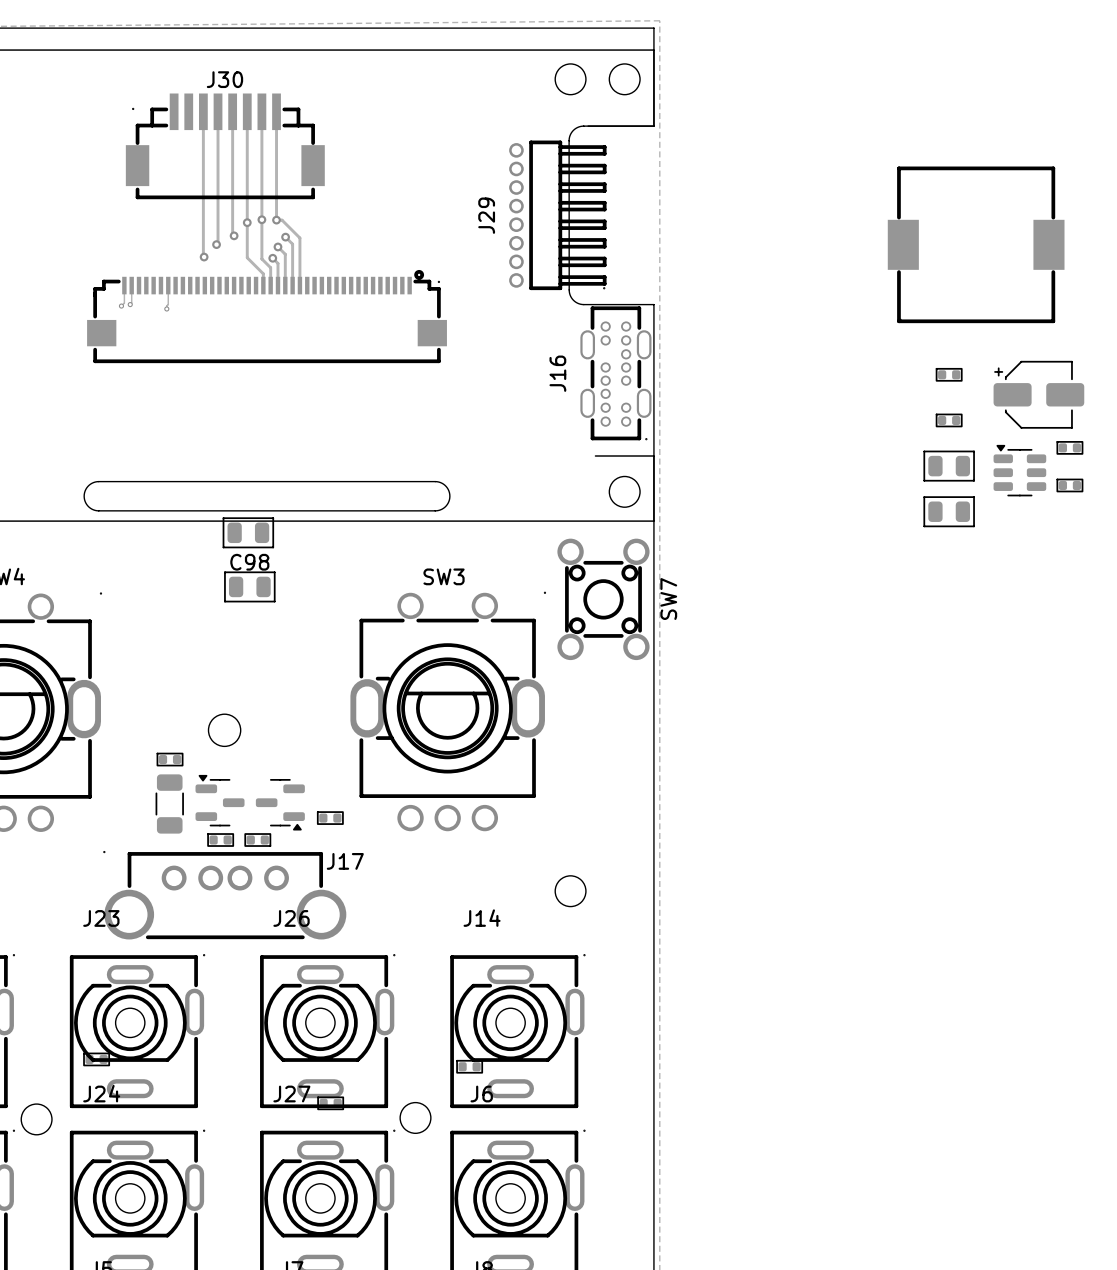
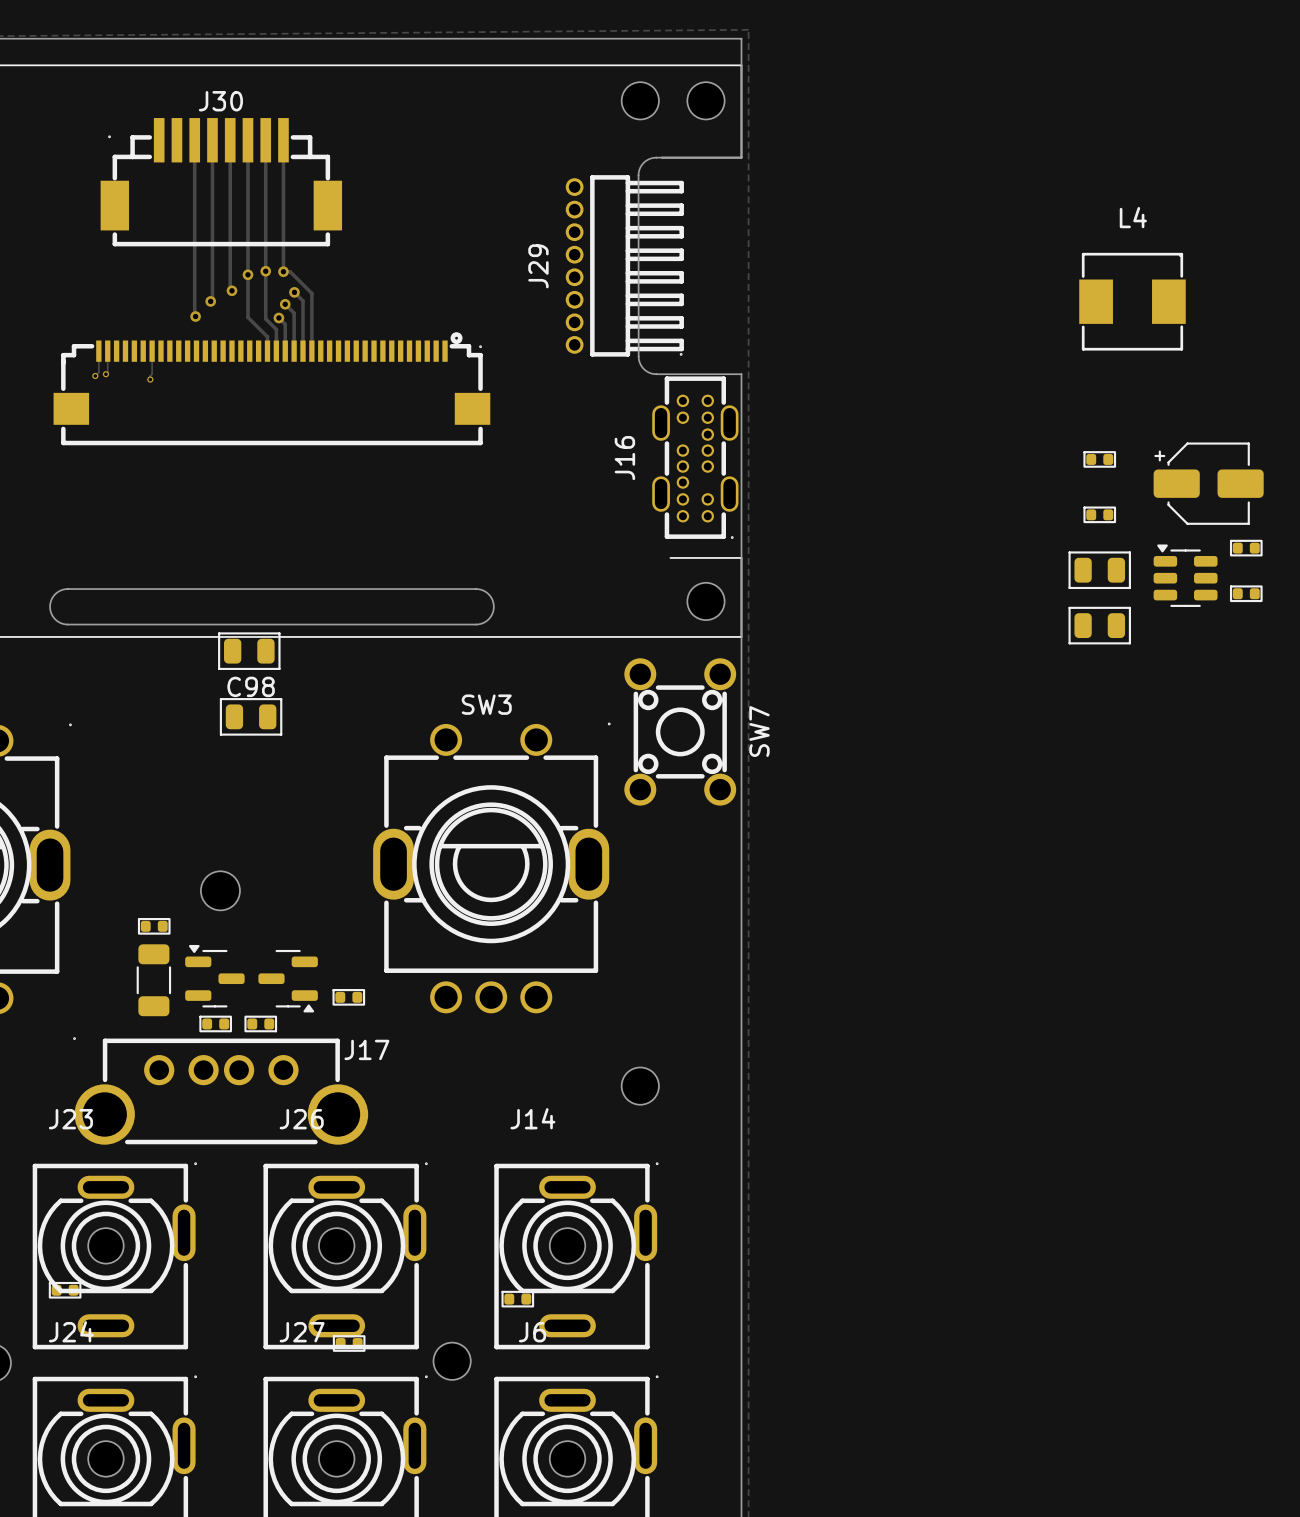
part: (976, 244) -> none
L4: none -> (1132, 301)

